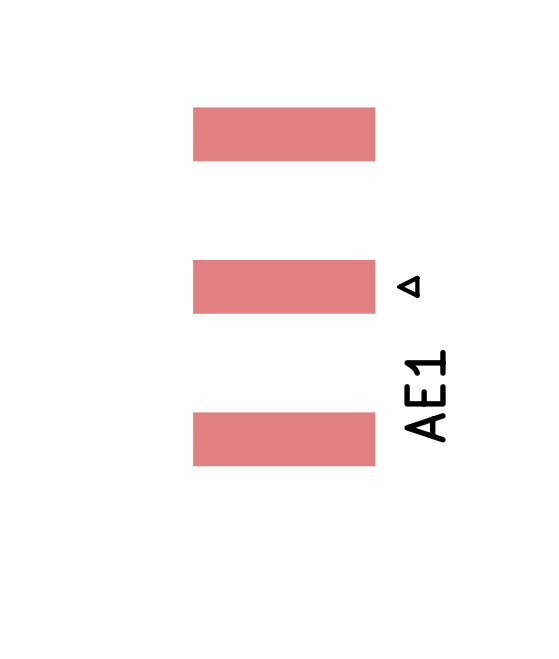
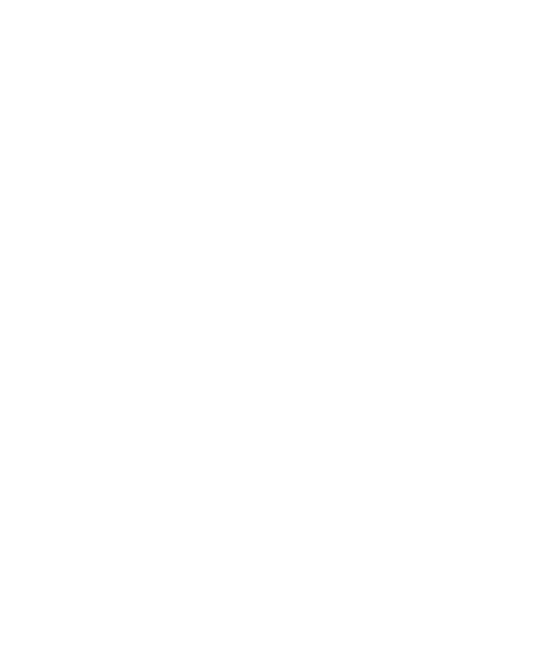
AE1: (306, 286) -> none

